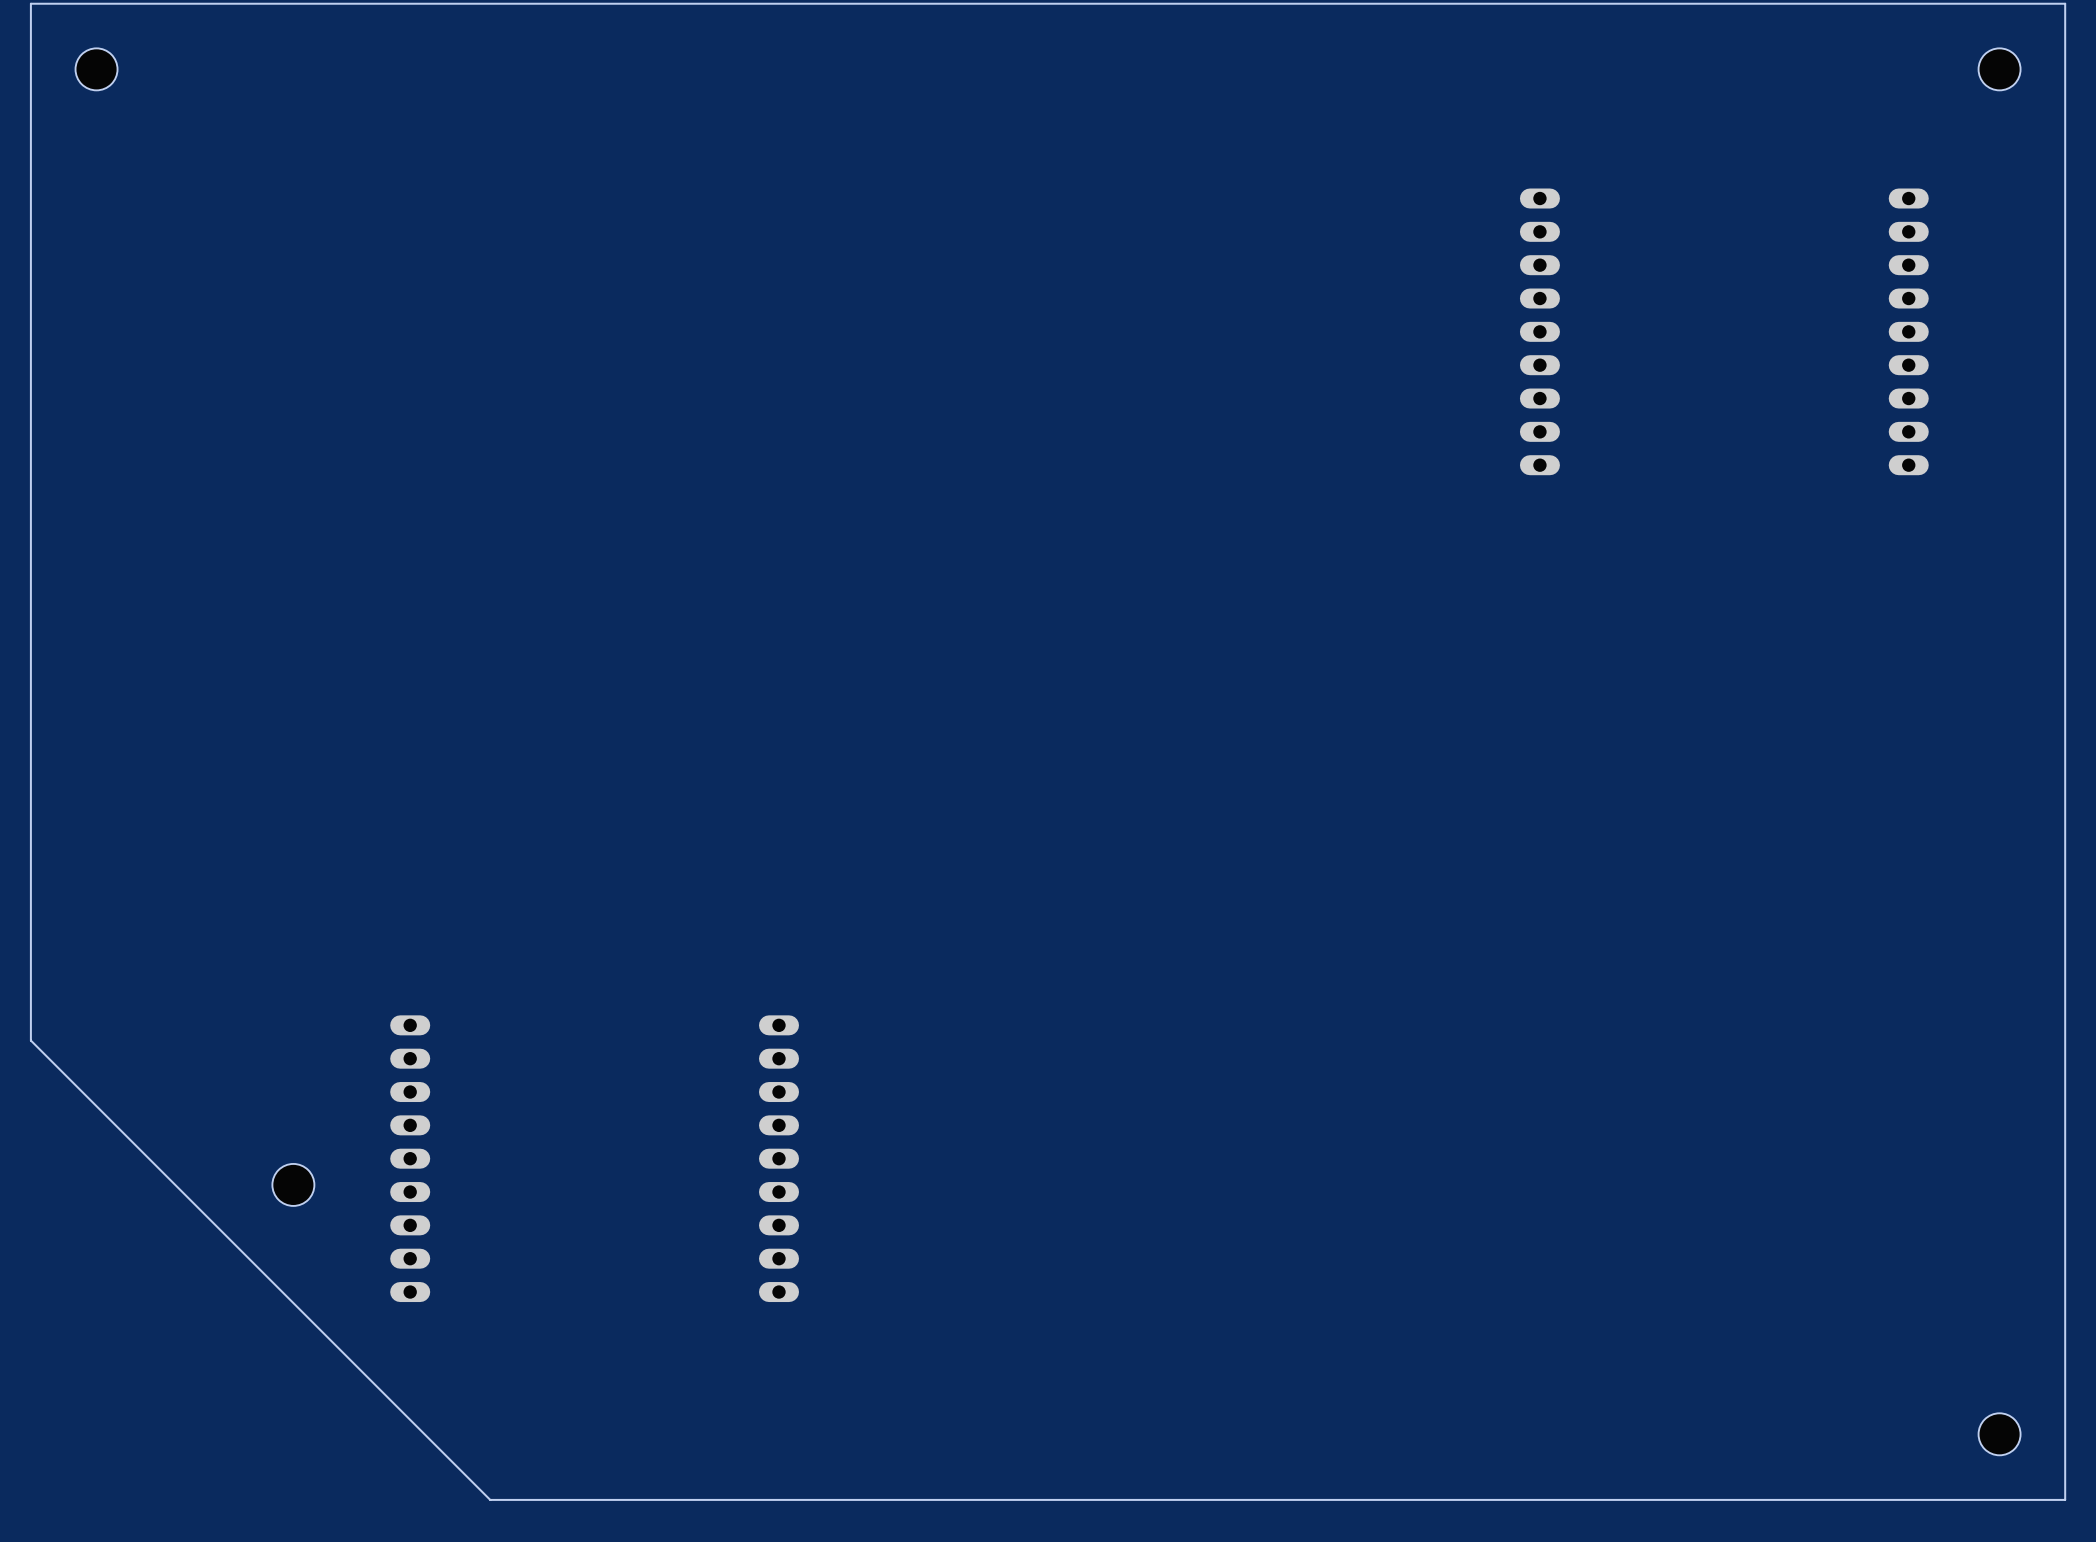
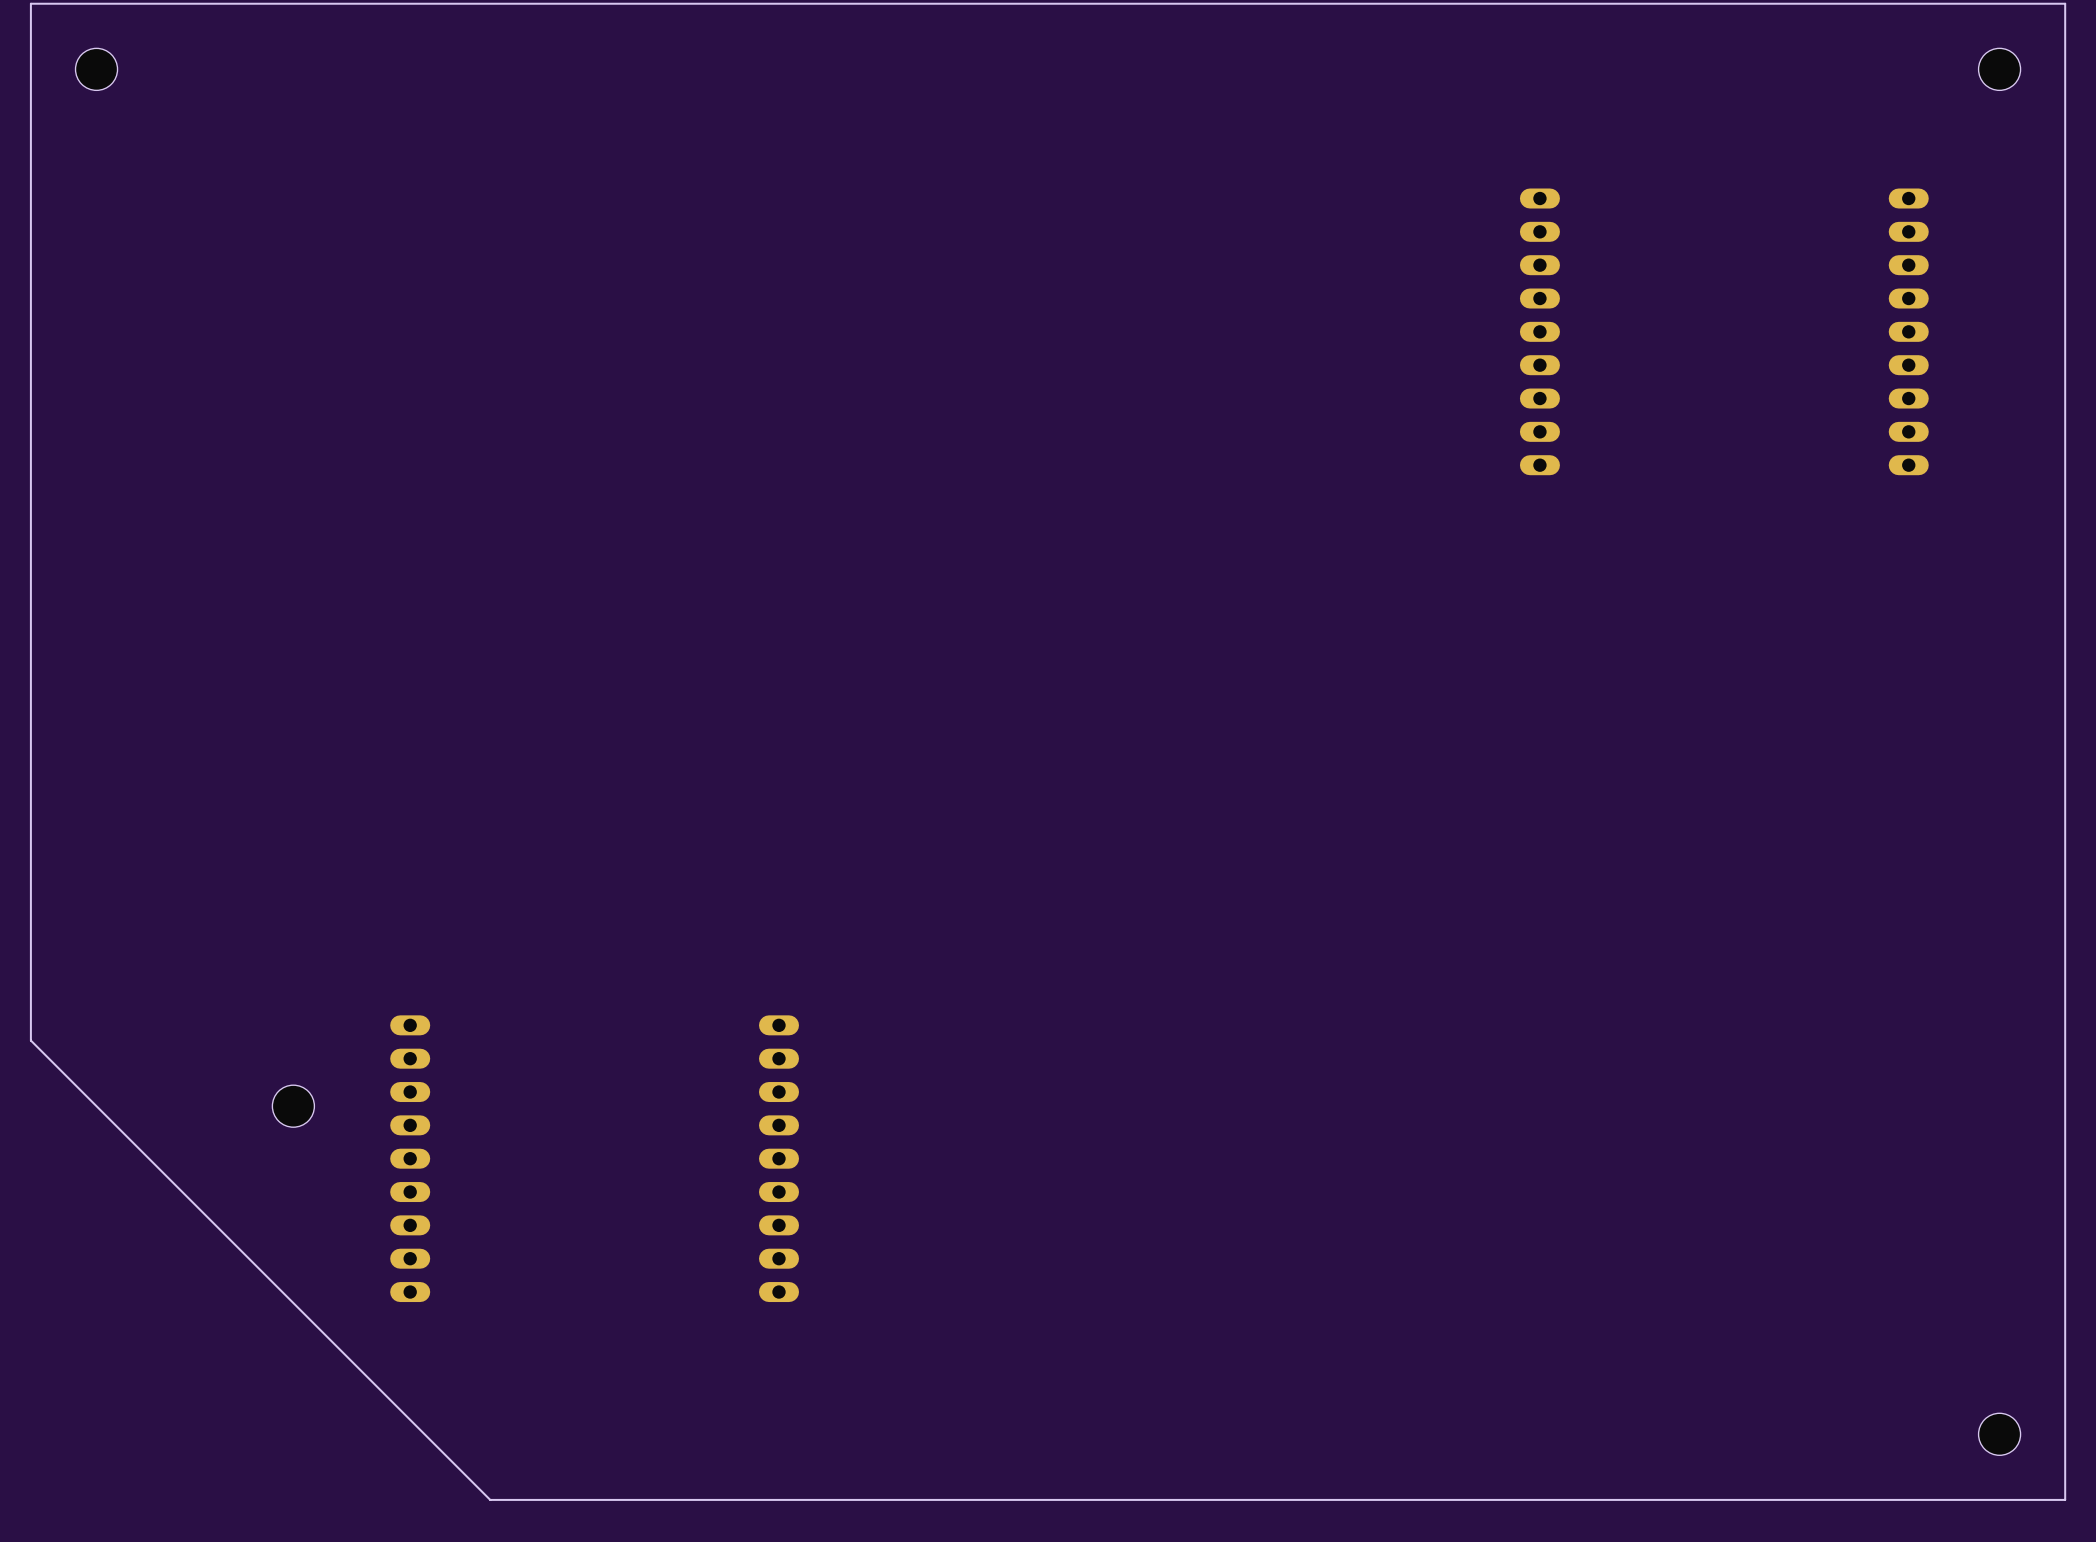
hole position: (293, 1184) -> (293, 1106)

